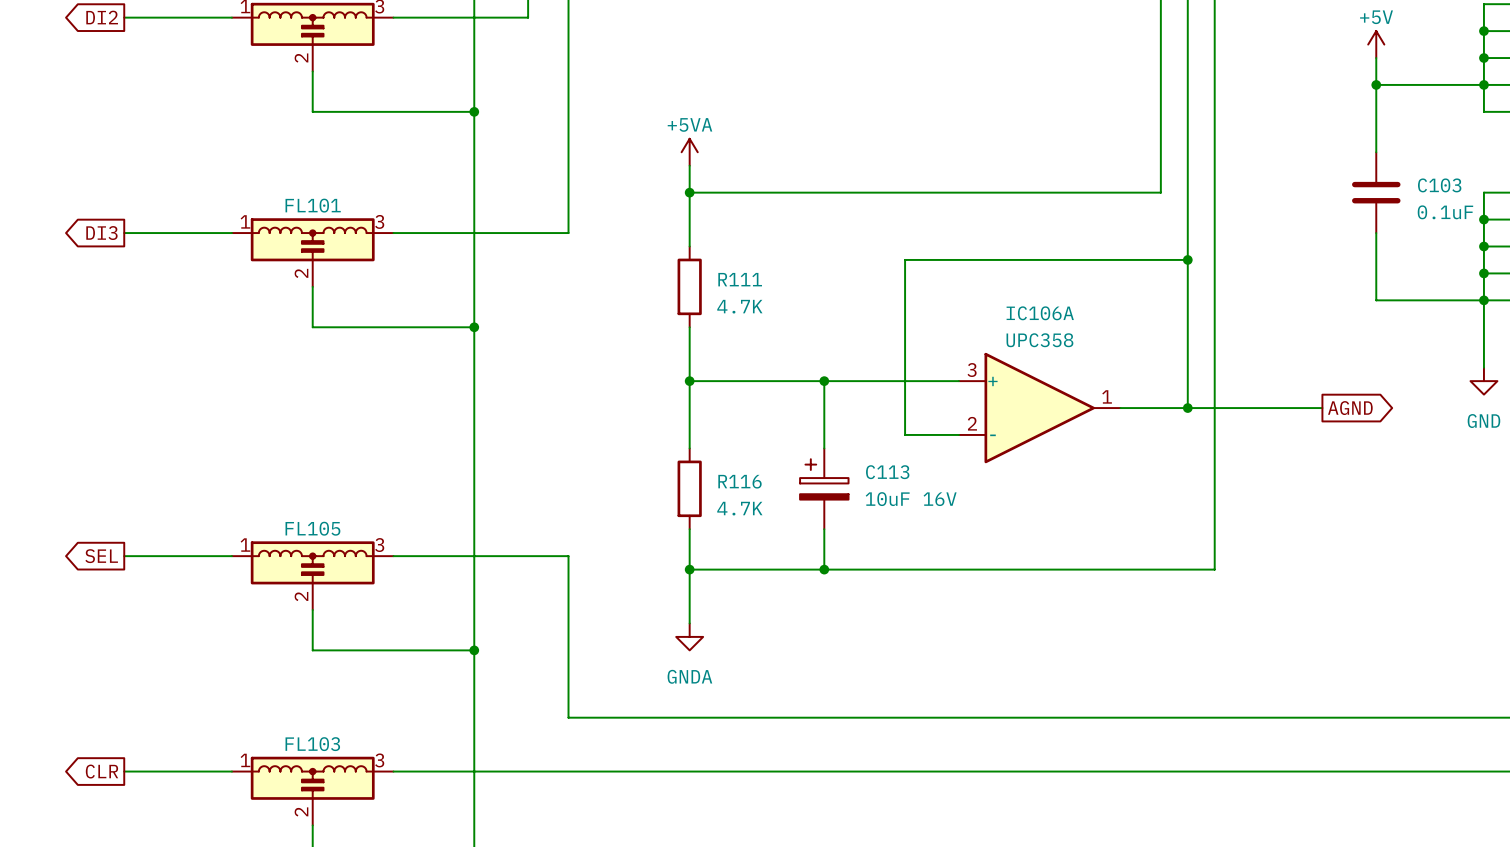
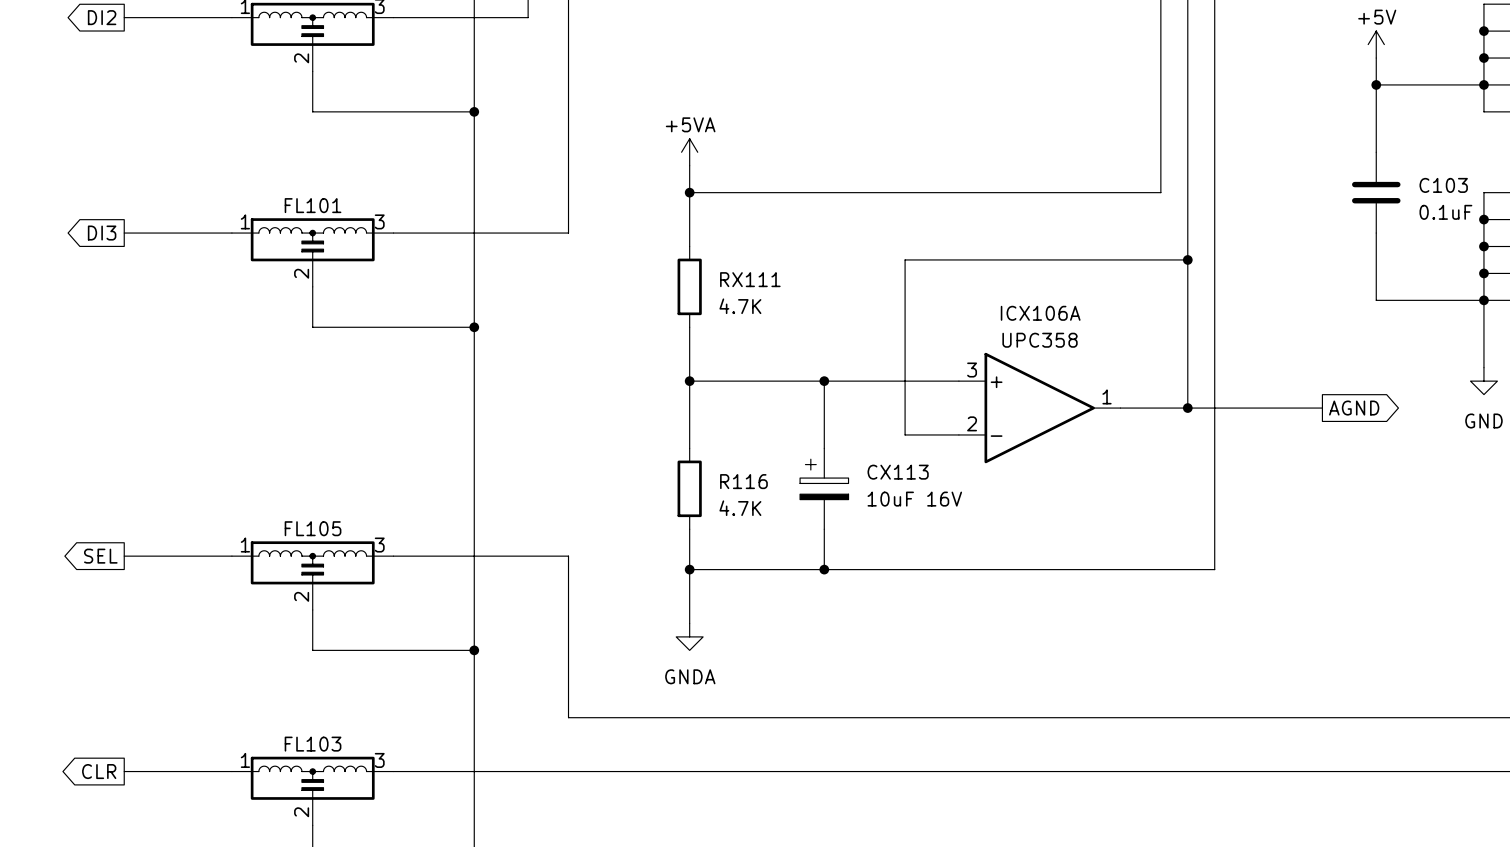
R111 name: R111 (740, 279) -> RX111 (750, 279)
IC106A name: IC106A (1040, 313) -> ICX106A (1040, 313)
C113 name: C113 (887, 472) -> CX113 (898, 472)

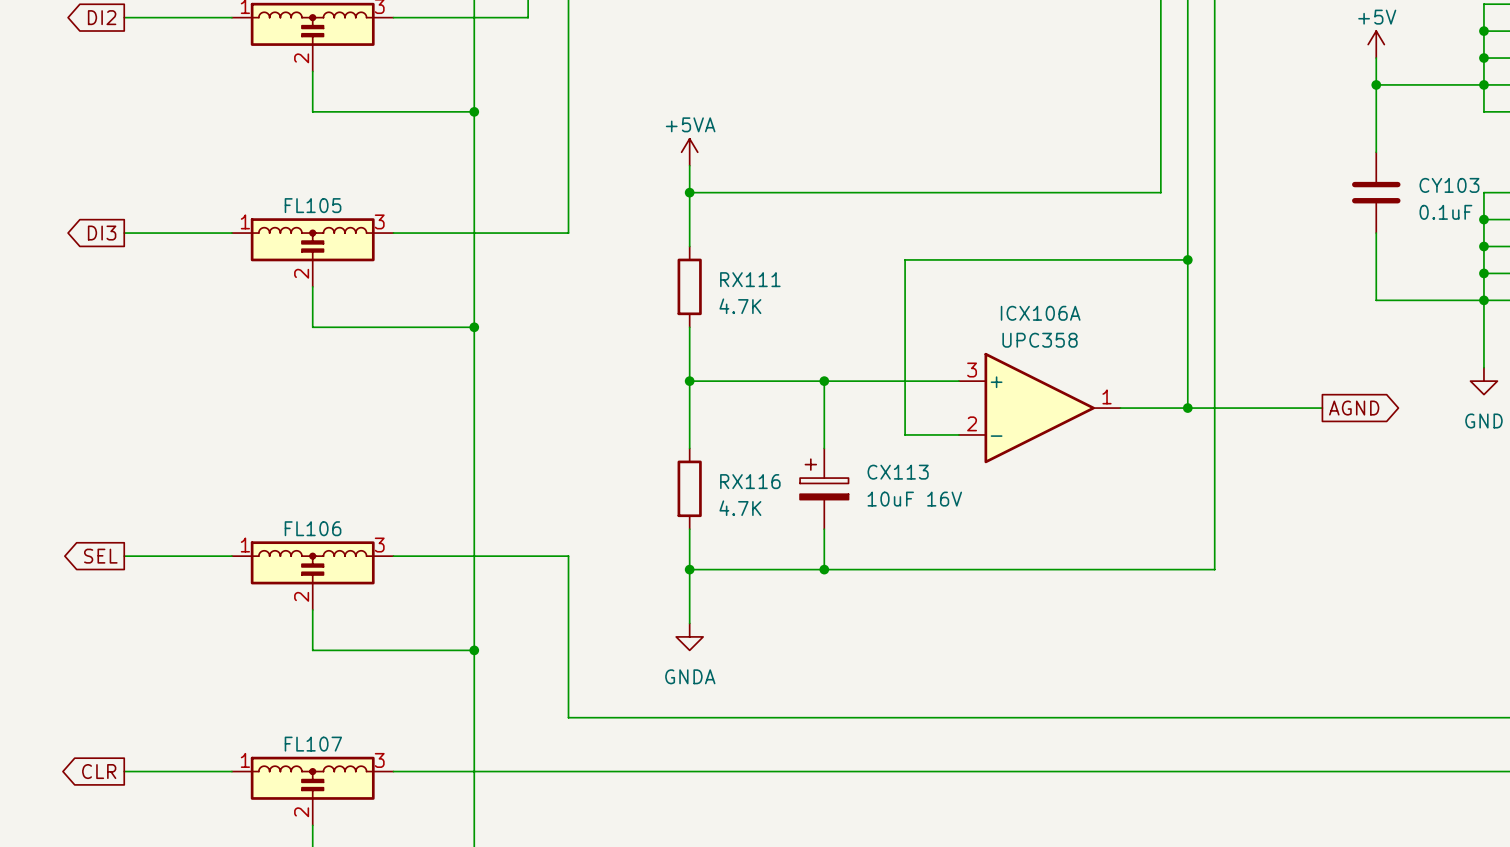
C103 name: C103 (1443, 185) -> CY103 (1449, 185)
FL101 name: FL101 (313, 205) -> FL105 (313, 205)
R116 name: R116 (743, 481) -> RX116 (750, 481)
FL105 name: FL105 (313, 528) -> FL106 (313, 528)
FL103 name: FL103 (313, 744) -> FL107 (313, 744)

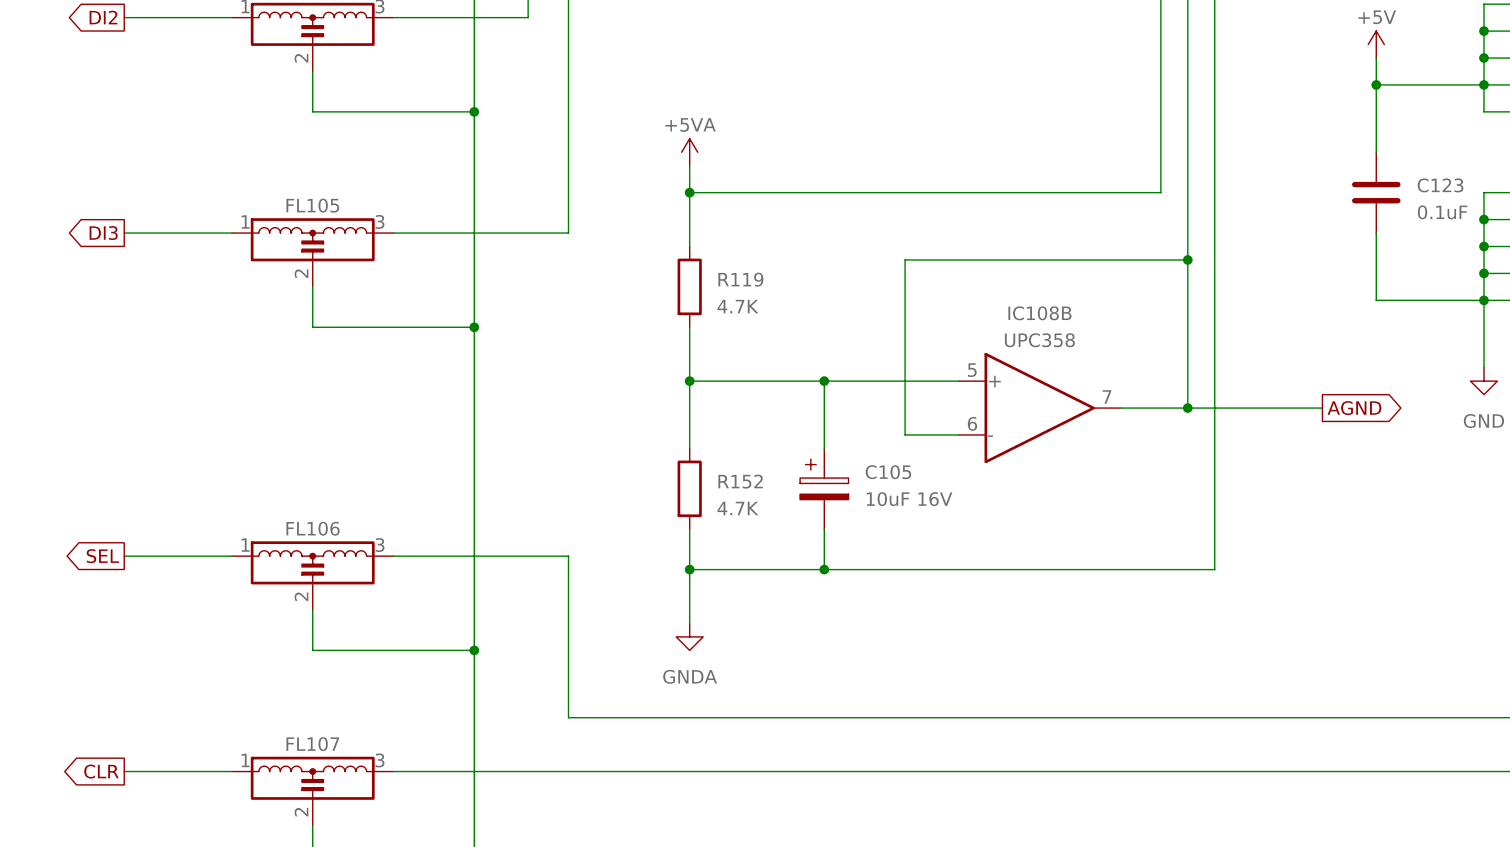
CY103 name: CY103 (1449, 185) -> C123 (1440, 185)
RX111 name: RX111 (750, 279) -> R119 (740, 279)
ICX106A name: ICX106A (1040, 313) -> IC108B (1039, 313)
ICX106A pin number: 3 (972, 370) -> 5 (972, 370)
ICX106A pin number: 1 (1107, 396) -> 7 (1106, 396)
ICX106A pin number: 2 (972, 423) -> 6 (972, 423)
CX113 name: CX113 (898, 472) -> C105 (888, 472)
RX116 name: RX116 (750, 481) -> R152 (740, 481)

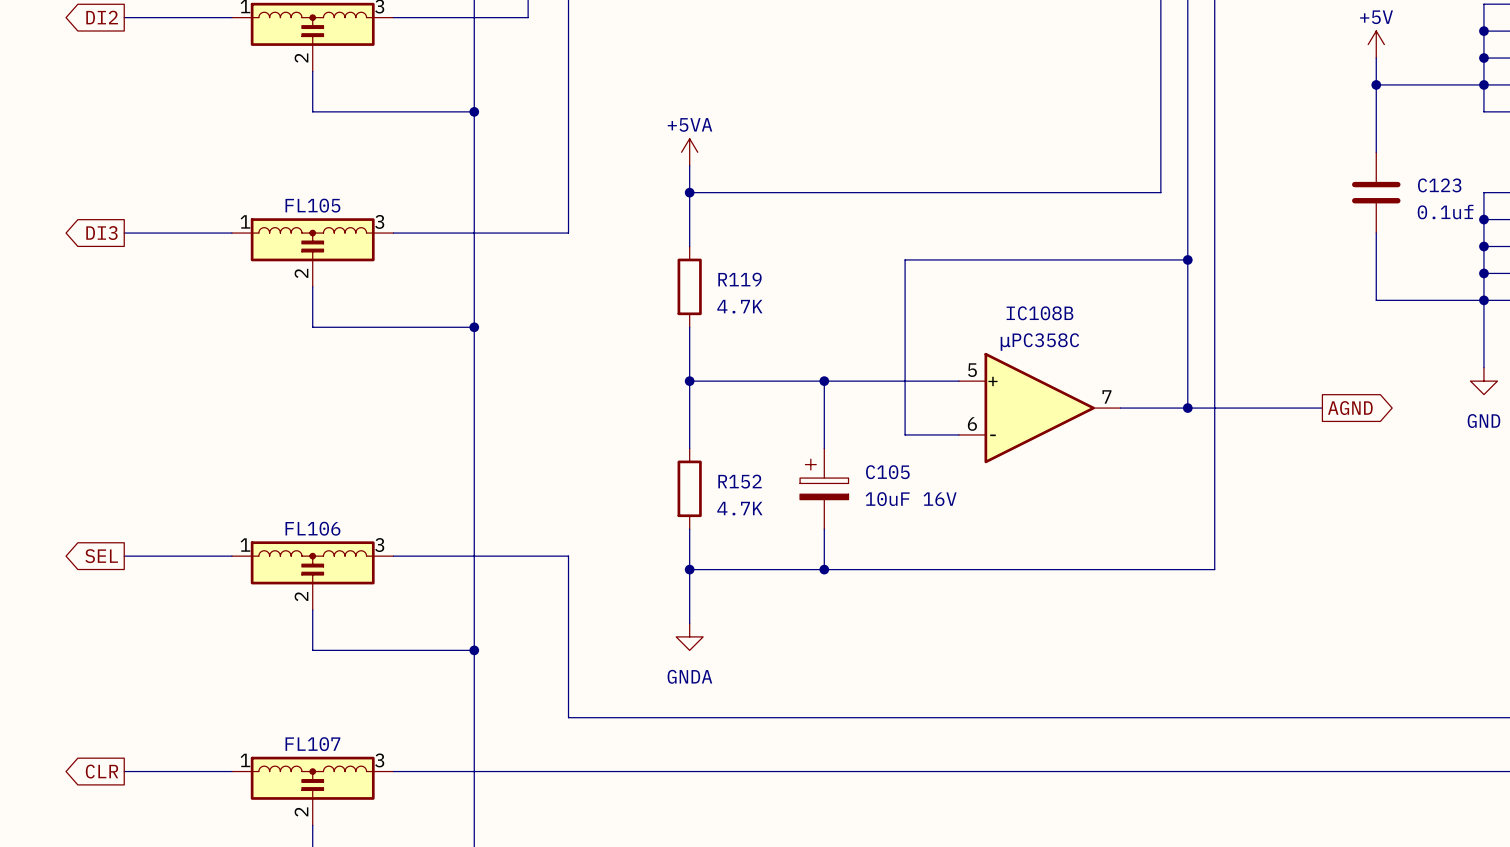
C123 value: 0.1uF (1442, 212) -> 0.1uf (1445, 212)
IC108B value: UPC358 (1039, 340) -> μPC358C (1039, 342)

